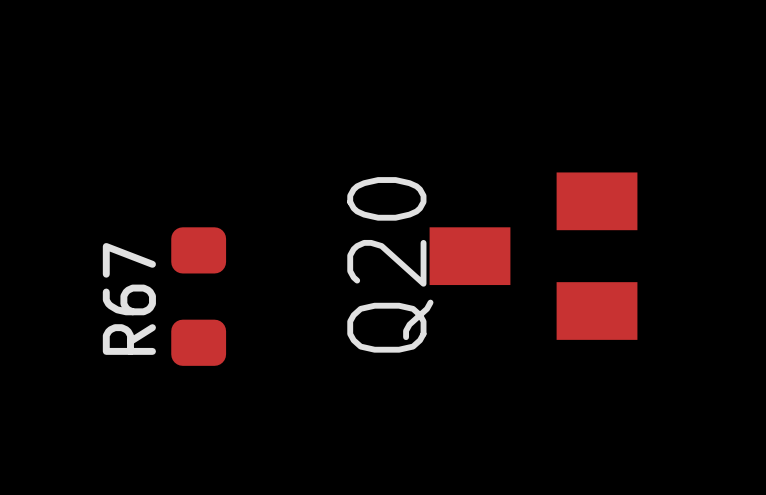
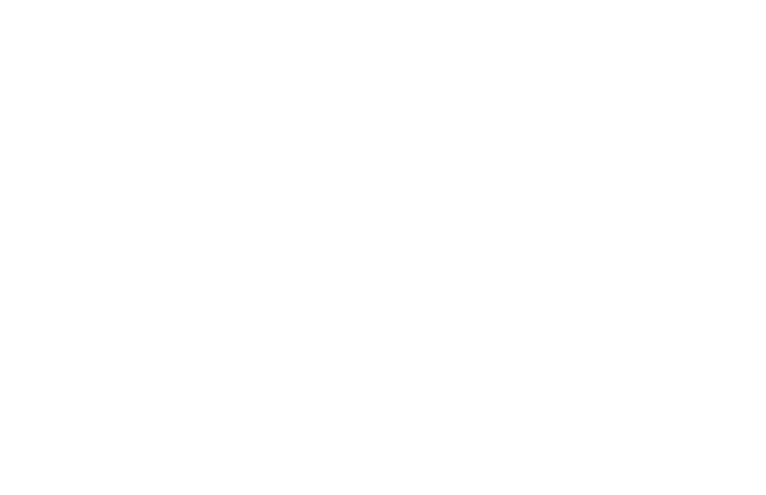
Q20: (533, 256) -> none
R67: (198, 296) -> none

